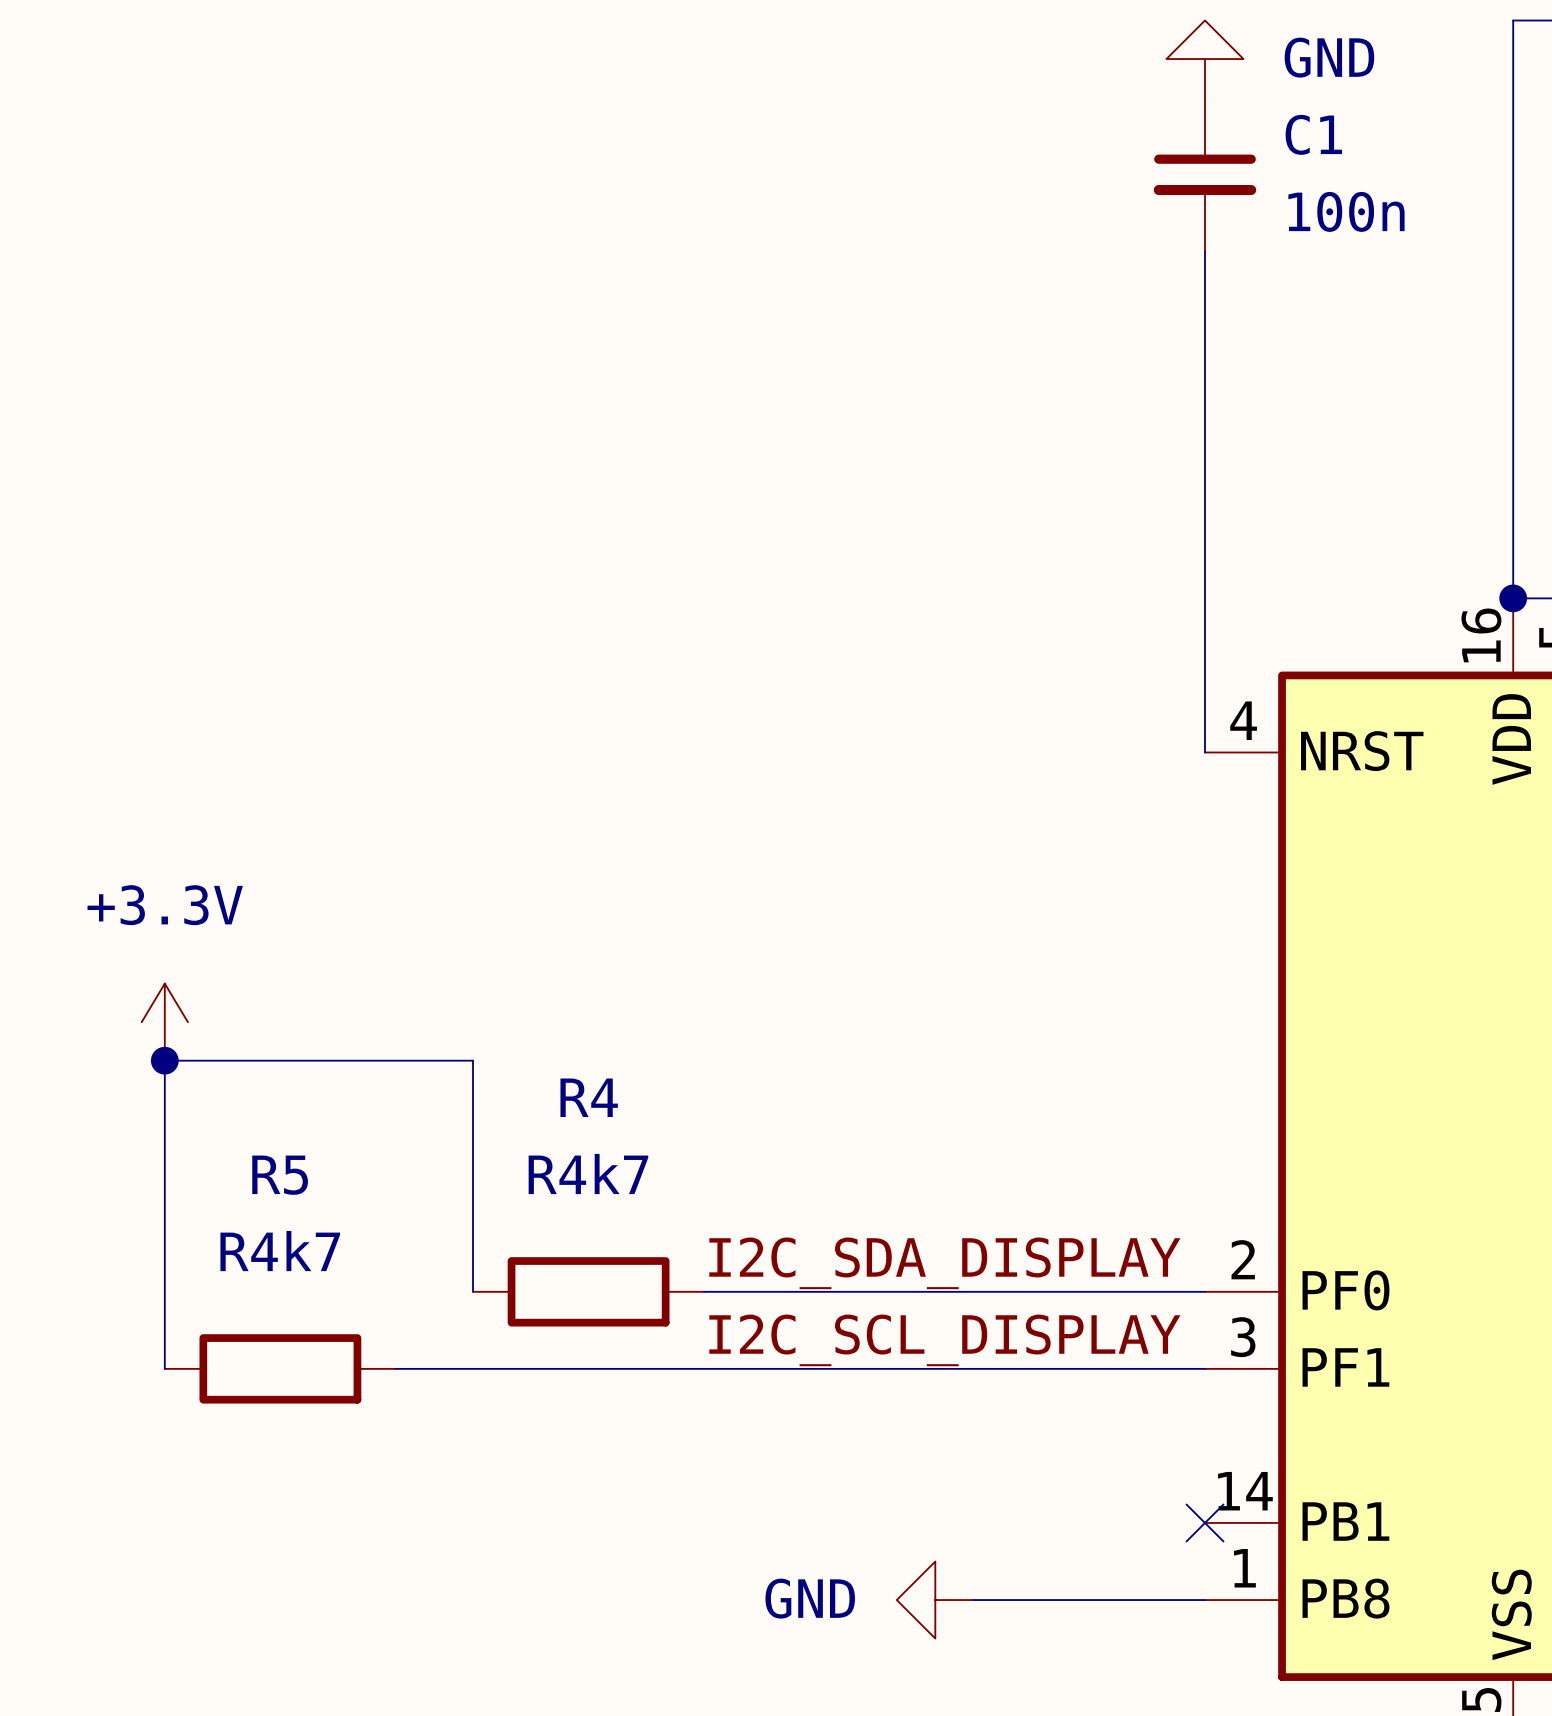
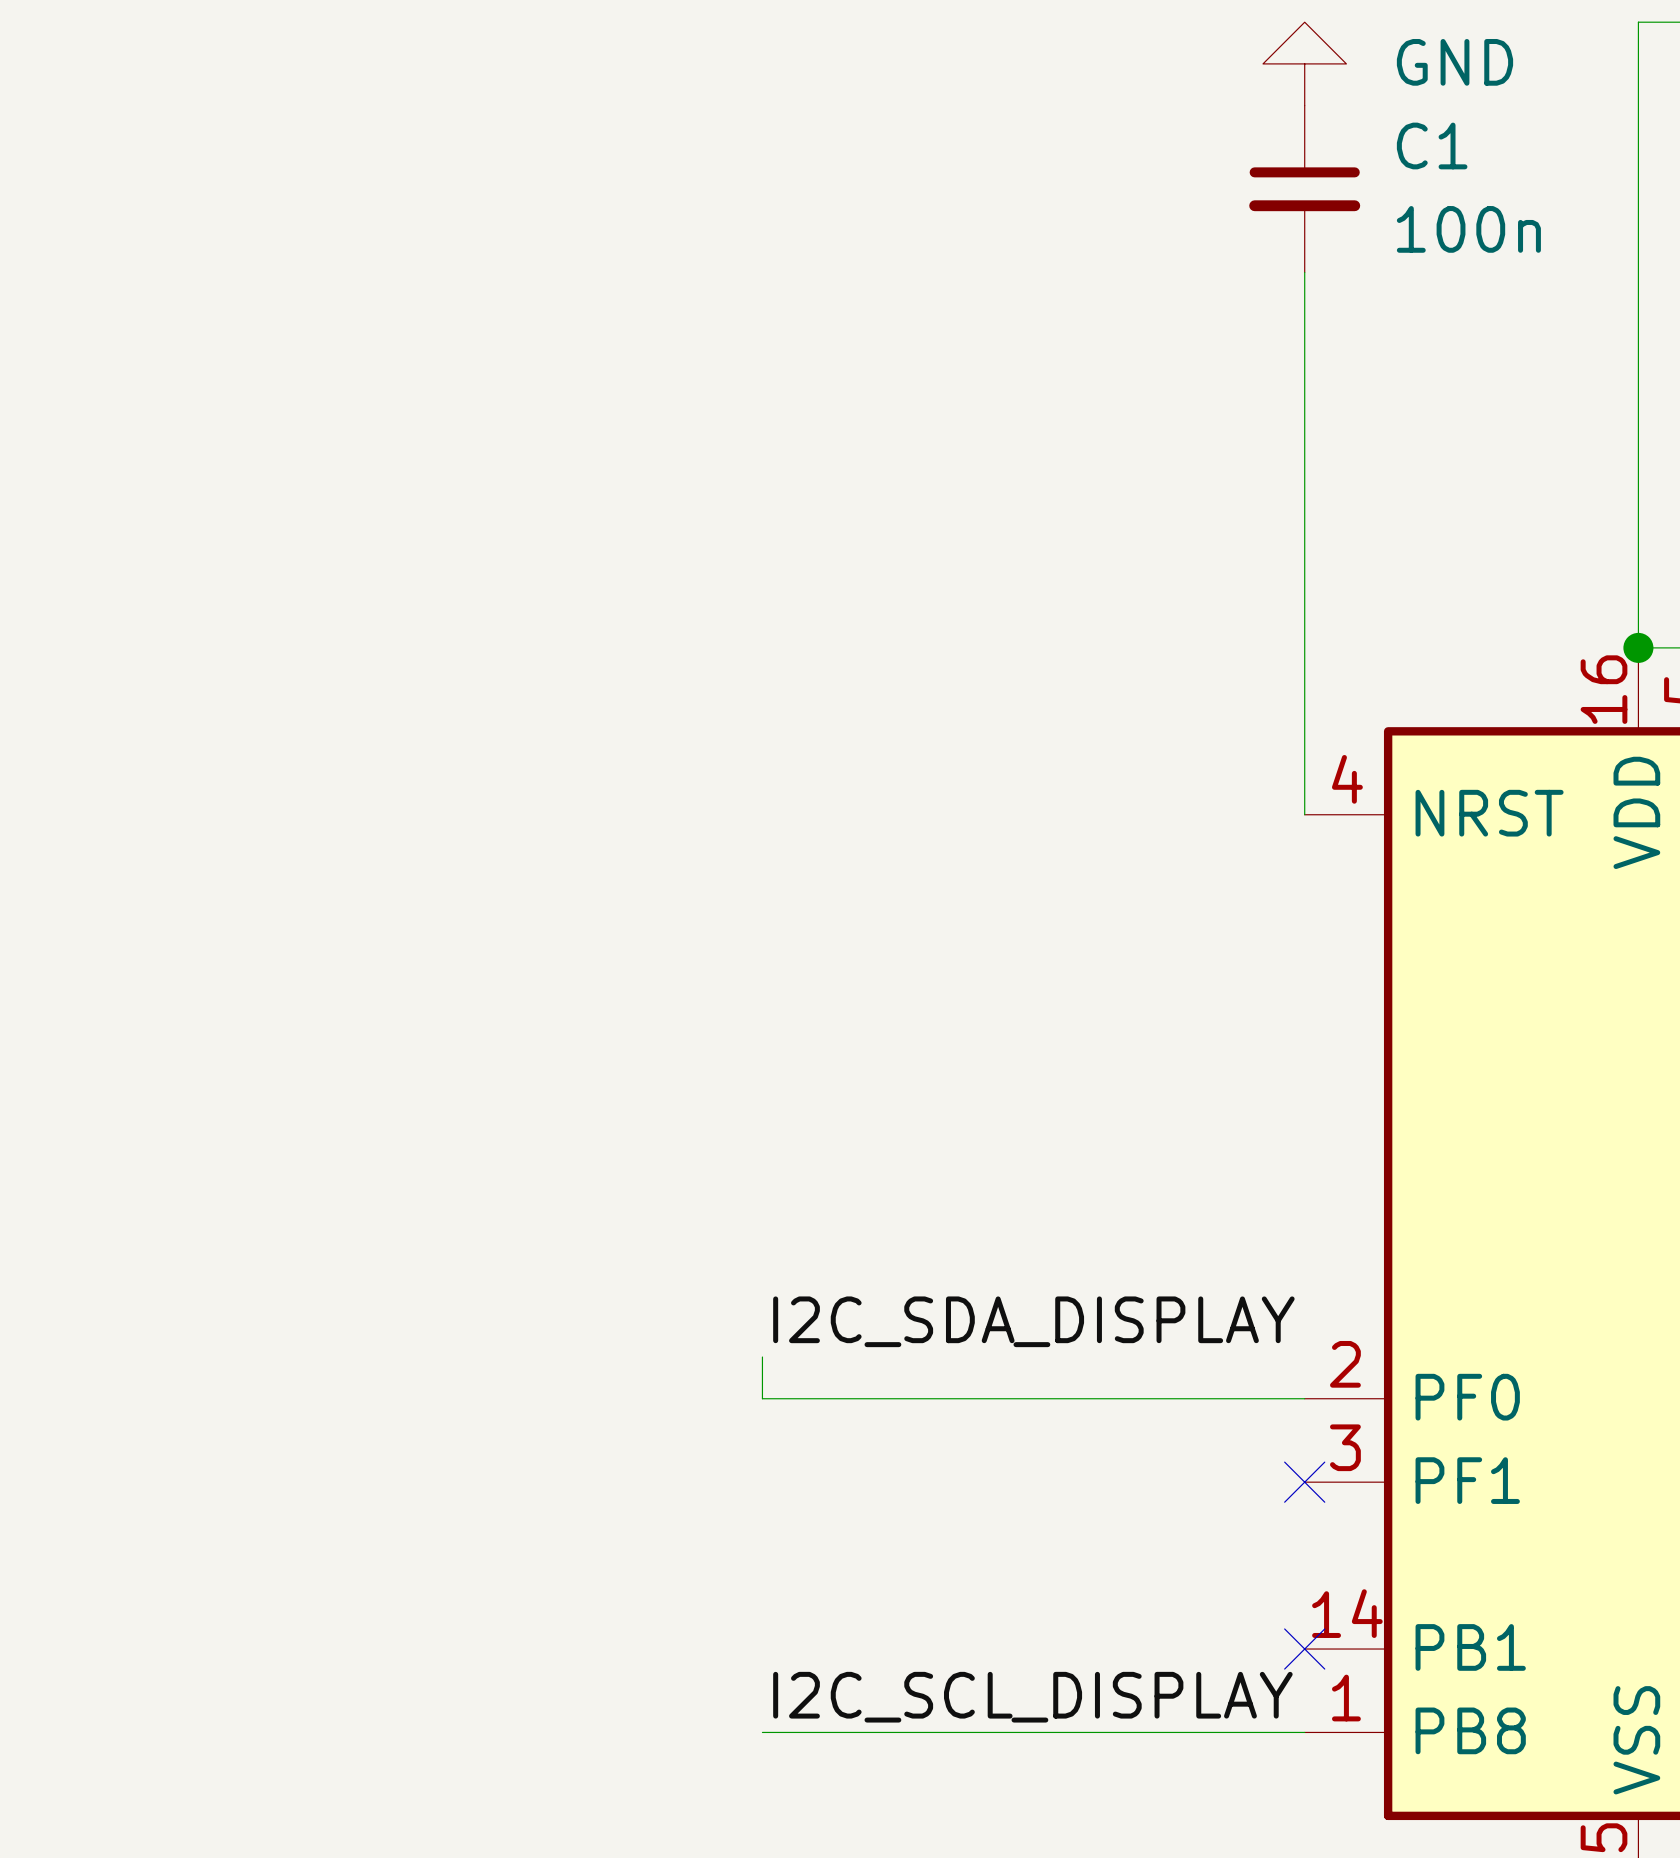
power symbol: +3.3V (164, 1022) -> none
junction: (164, 1060) -> none
wire: none -> (762, 1357) (762, 1398)
label position: I2C_SDA_DISPLAY (944, 1263) -> I2C_SDA_DISPLAY (1033, 1321)
wire: (473, 1291) (473, 1060) (164, 1060) (164, 1368) -> none
R4: R4k7 (588, 1291) -> none
label position: I2C_SCL_DISPLAY (944, 1340) -> I2C_SCL_DISPLAY (1032, 1697)
R5: R4k7 (280, 1368) -> none
wire: (395, 1368) (1204, 1368) -> none
no-connect mark: none -> (1304, 1482)
wire: none -> (762, 1732) (1054, 1732)
power symbol: GND (935, 1600) -> none

